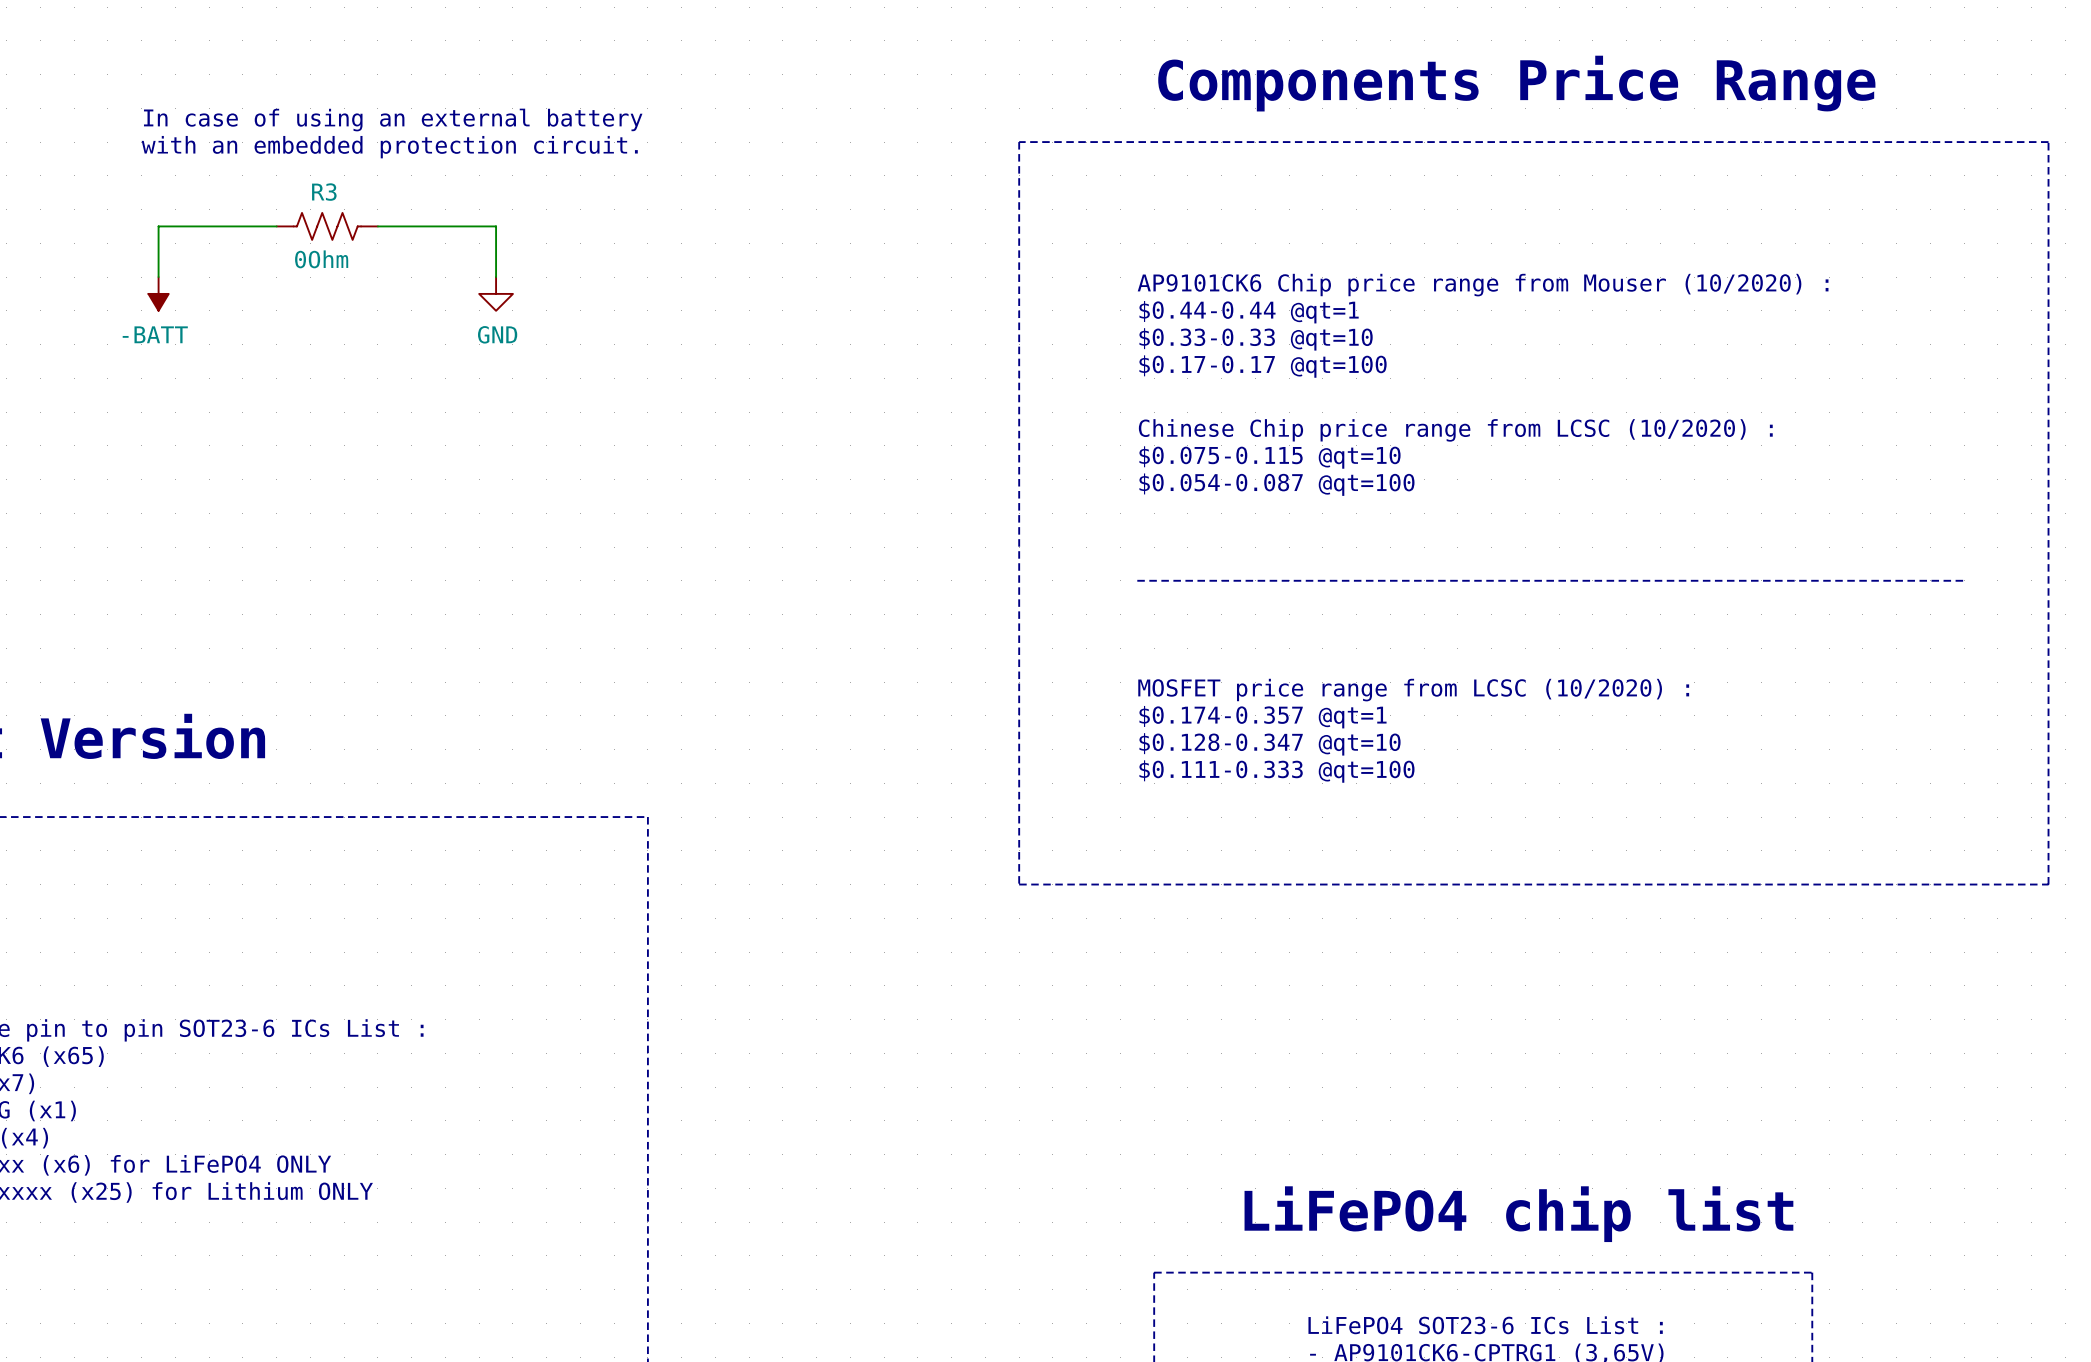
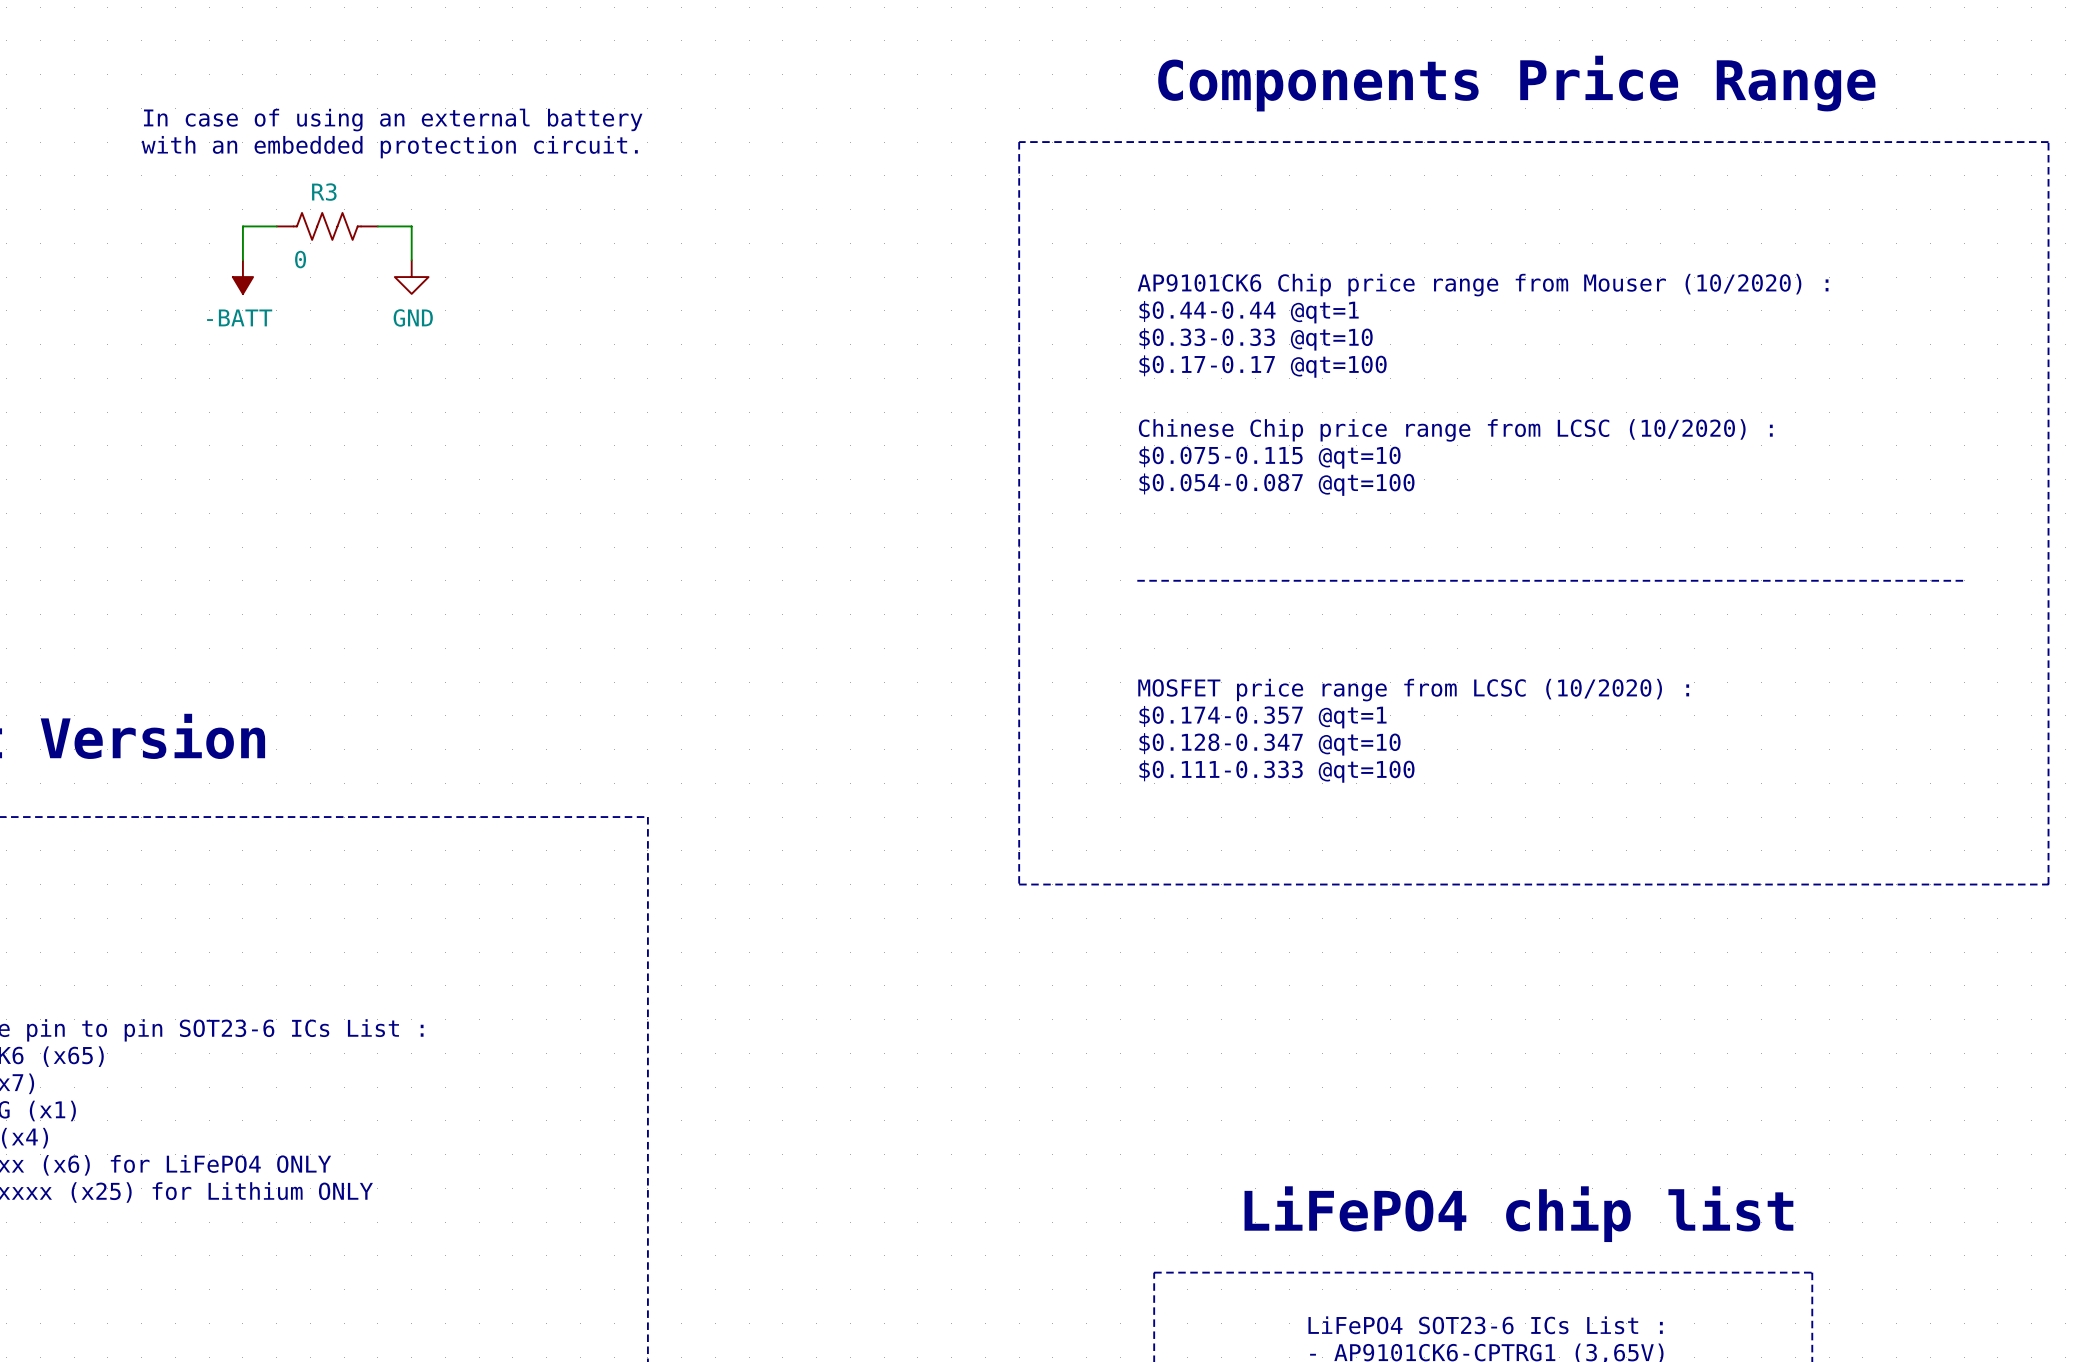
wire: (242, 226) (158, 226) (158, 277) -> (242, 226) (242, 260)
wire: (411, 226) (496, 226) (496, 277) -> (411, 226) (411, 260)
R3 value: 0Ohm (321, 259) -> 0 (300, 259)
power symbol position: -BATT (158, 293) -> -BATT (242, 277)
power symbol position: GND (496, 293) -> GND (411, 277)

